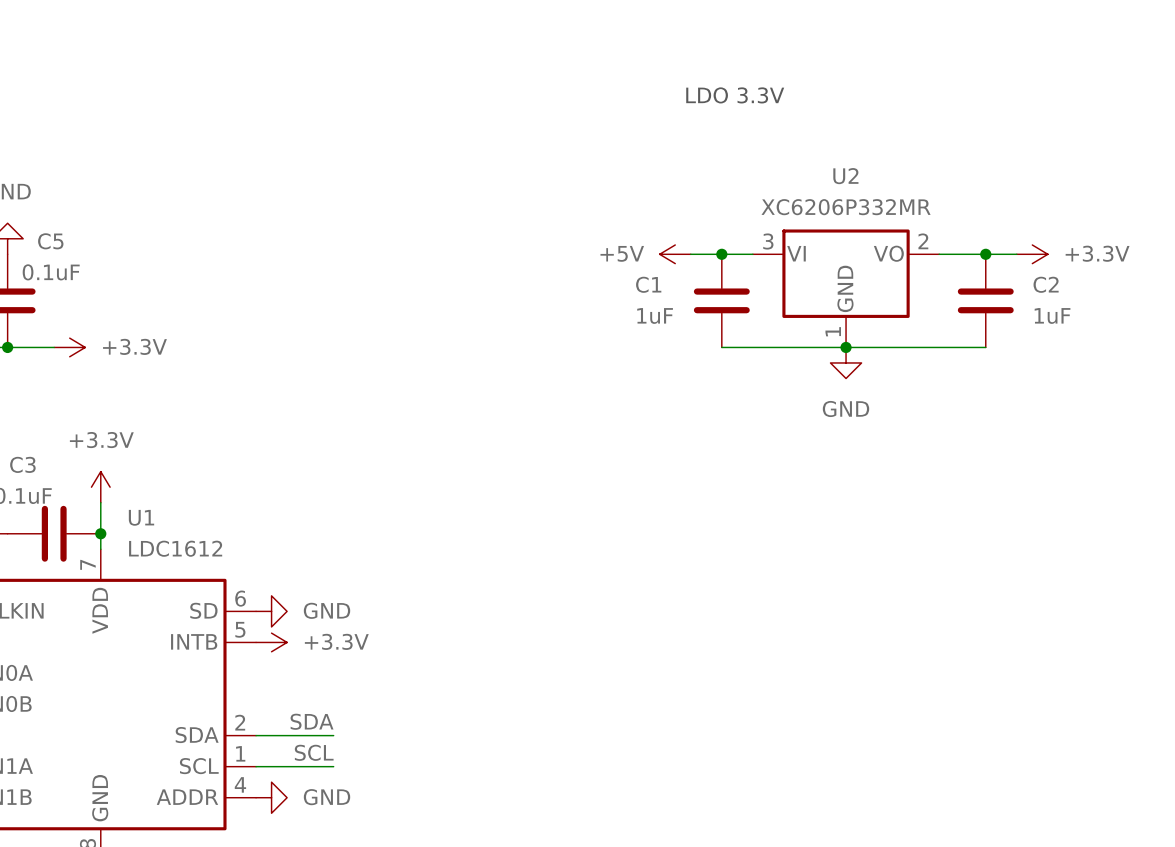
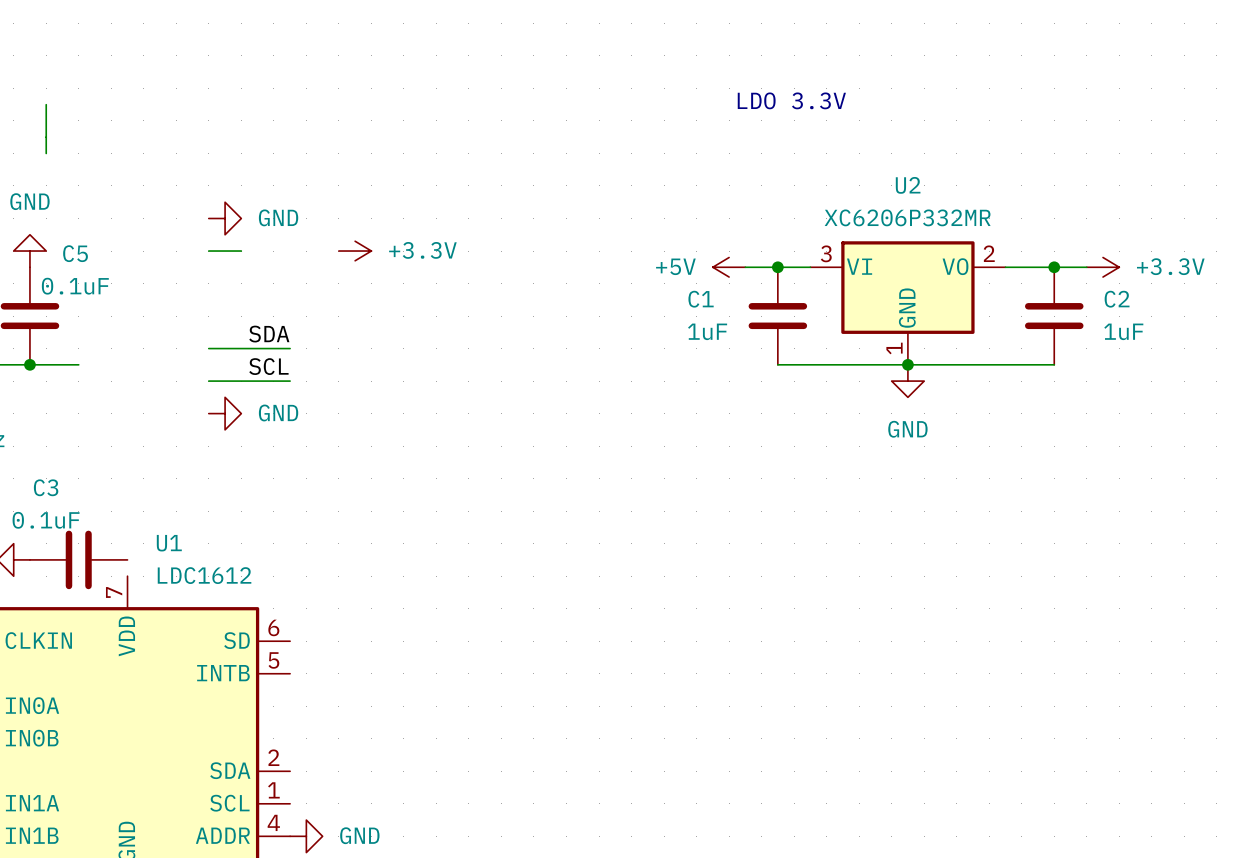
wire: none -> (46, 104) (46, 153)
power symbol: none -> GND (225, 218)
wire: none -> (208, 251) (241, 251)
power symbol: none -> +3.3V (355, 251)
label: none -> SDA (269, 334)
wire: none -> (208, 348) (290, 348)
power symbol: +3.3V (69, 347) -> none
label: none -> SCL (268, 366)
wire: none -> (208, 381) (290, 381)
power symbol: none -> GND (225, 413)
power symbol: +3.3V (100, 487) -> none
wire: (100, 502) (100, 549) -> none
junction: (100, 533) -> none
power symbol: GND (271, 611) -> none
power symbol: +3.3V (271, 642) -> none
label: SDA (312, 721) -> none
wire: (256, 735) (333, 735) -> none
label: SCL (314, 752) -> none
wire: (256, 766) (333, 766) -> none

